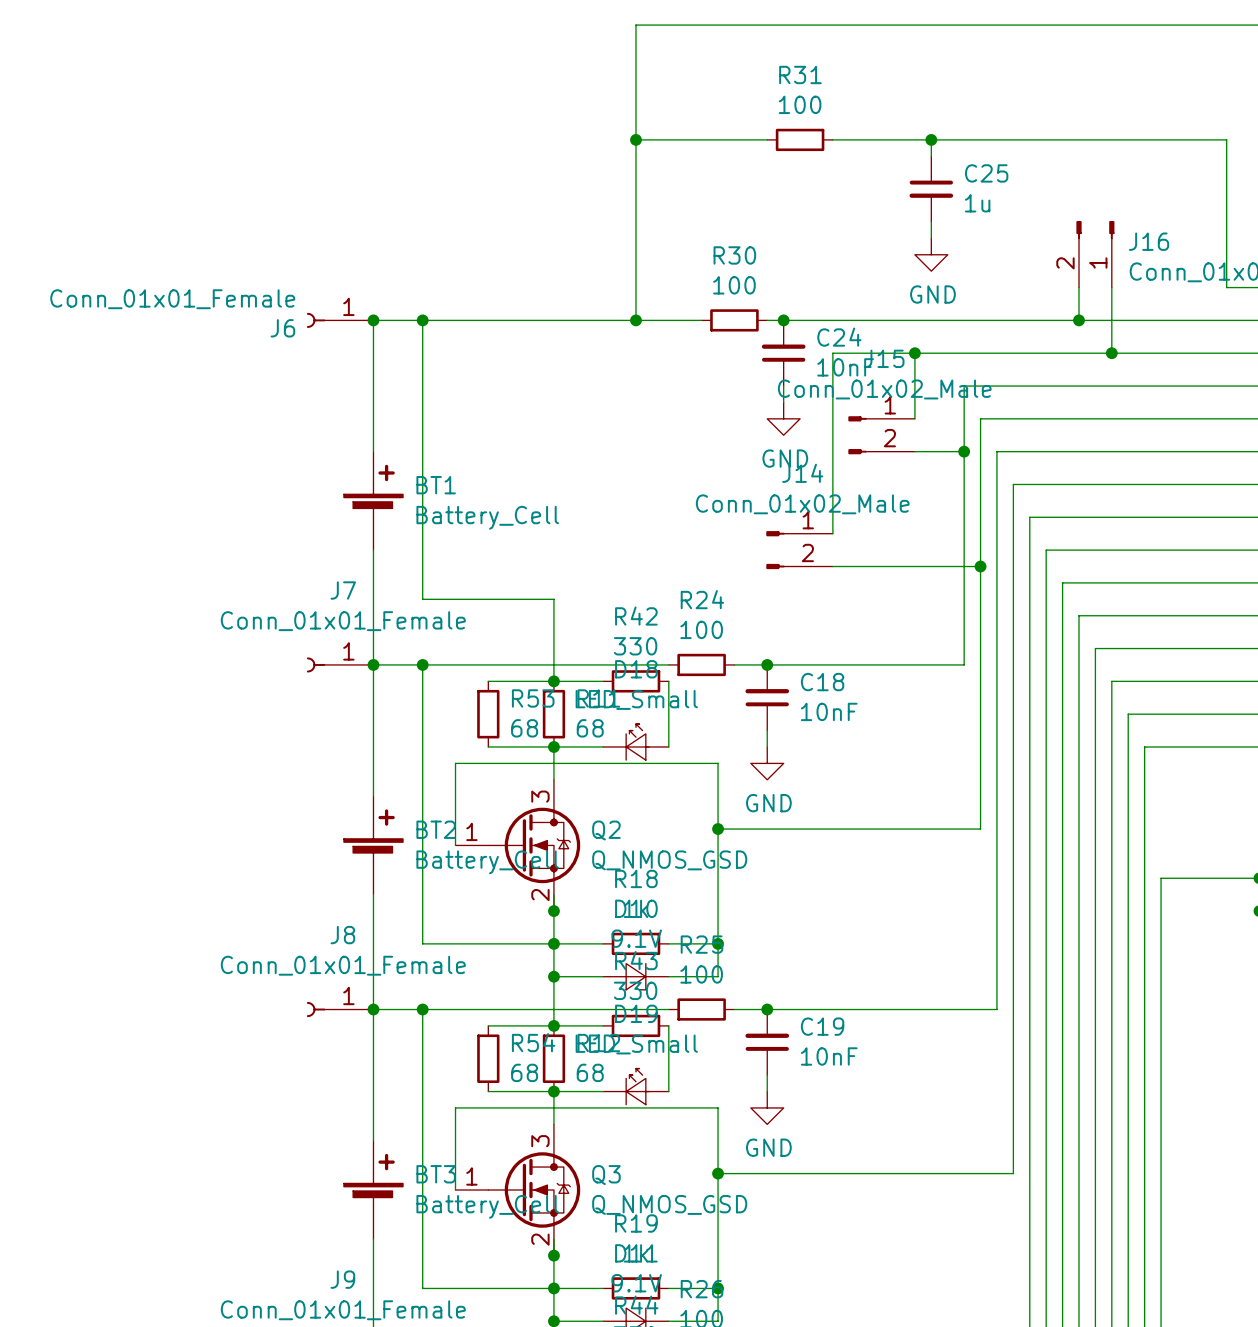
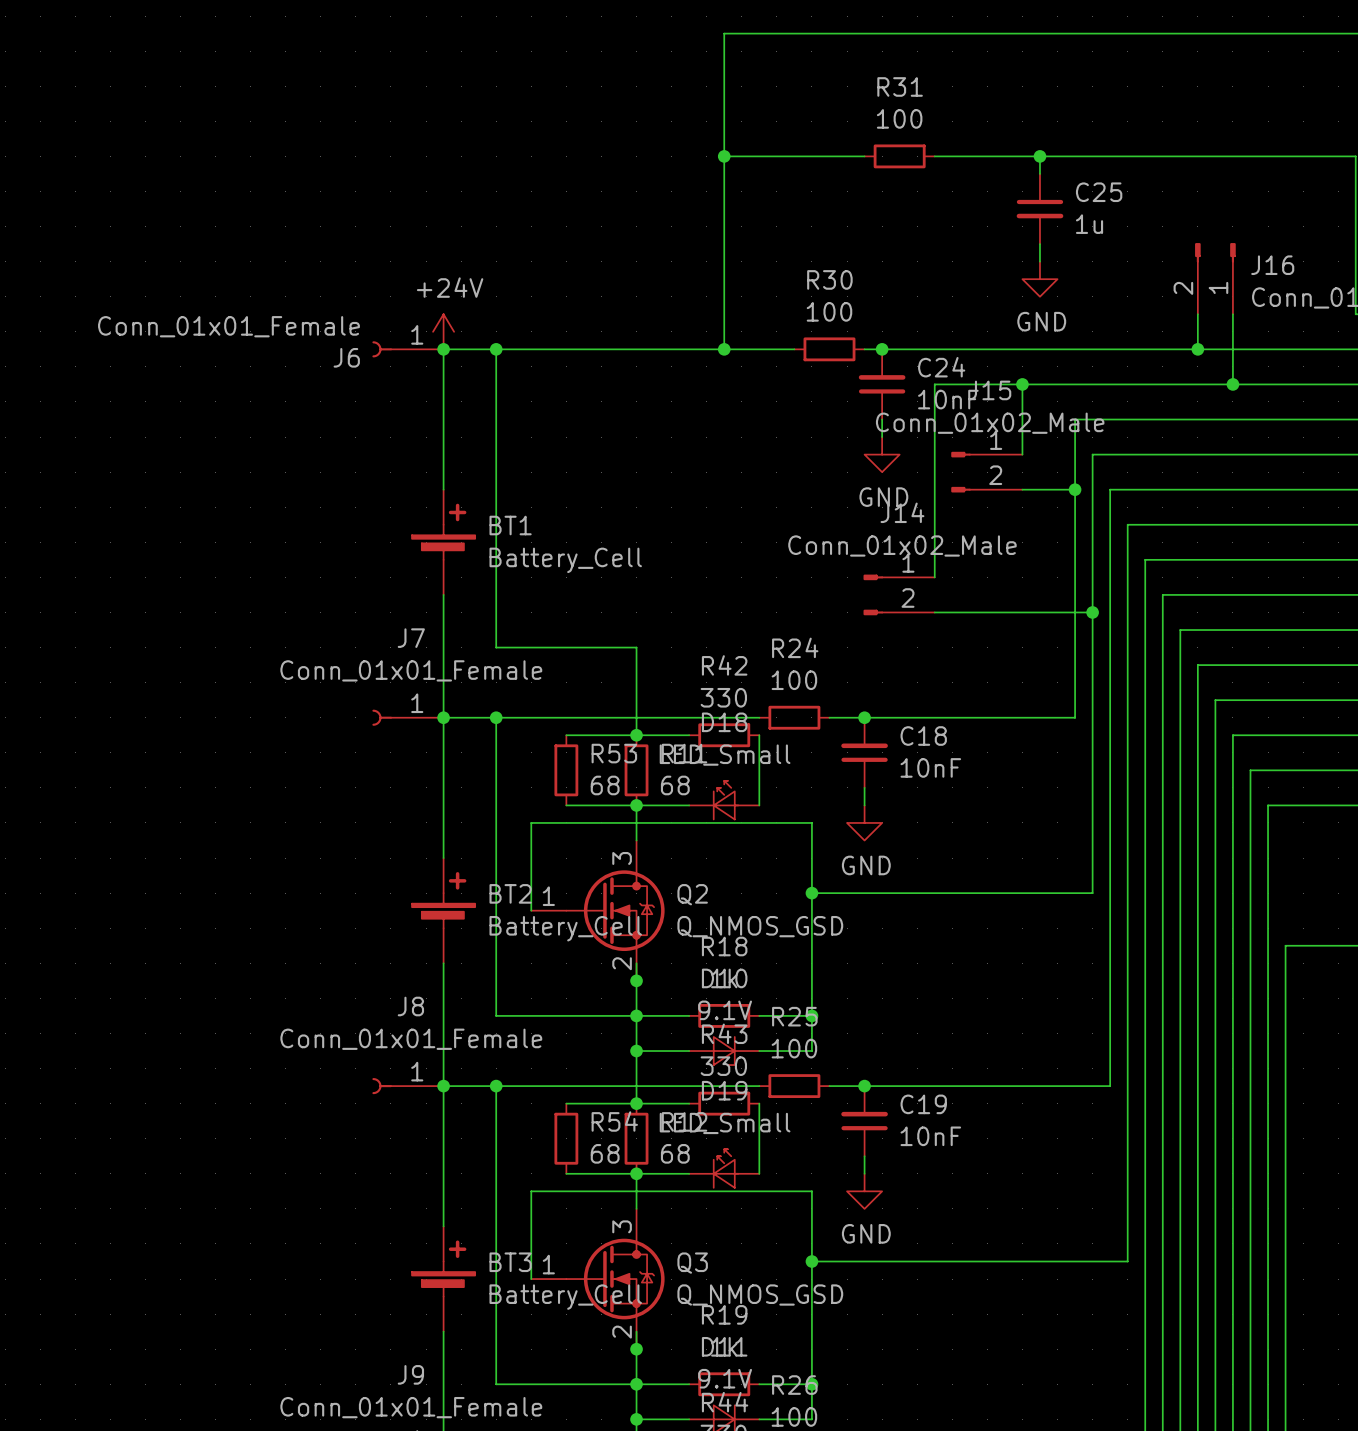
power symbol: none -> +24V (443, 331)

